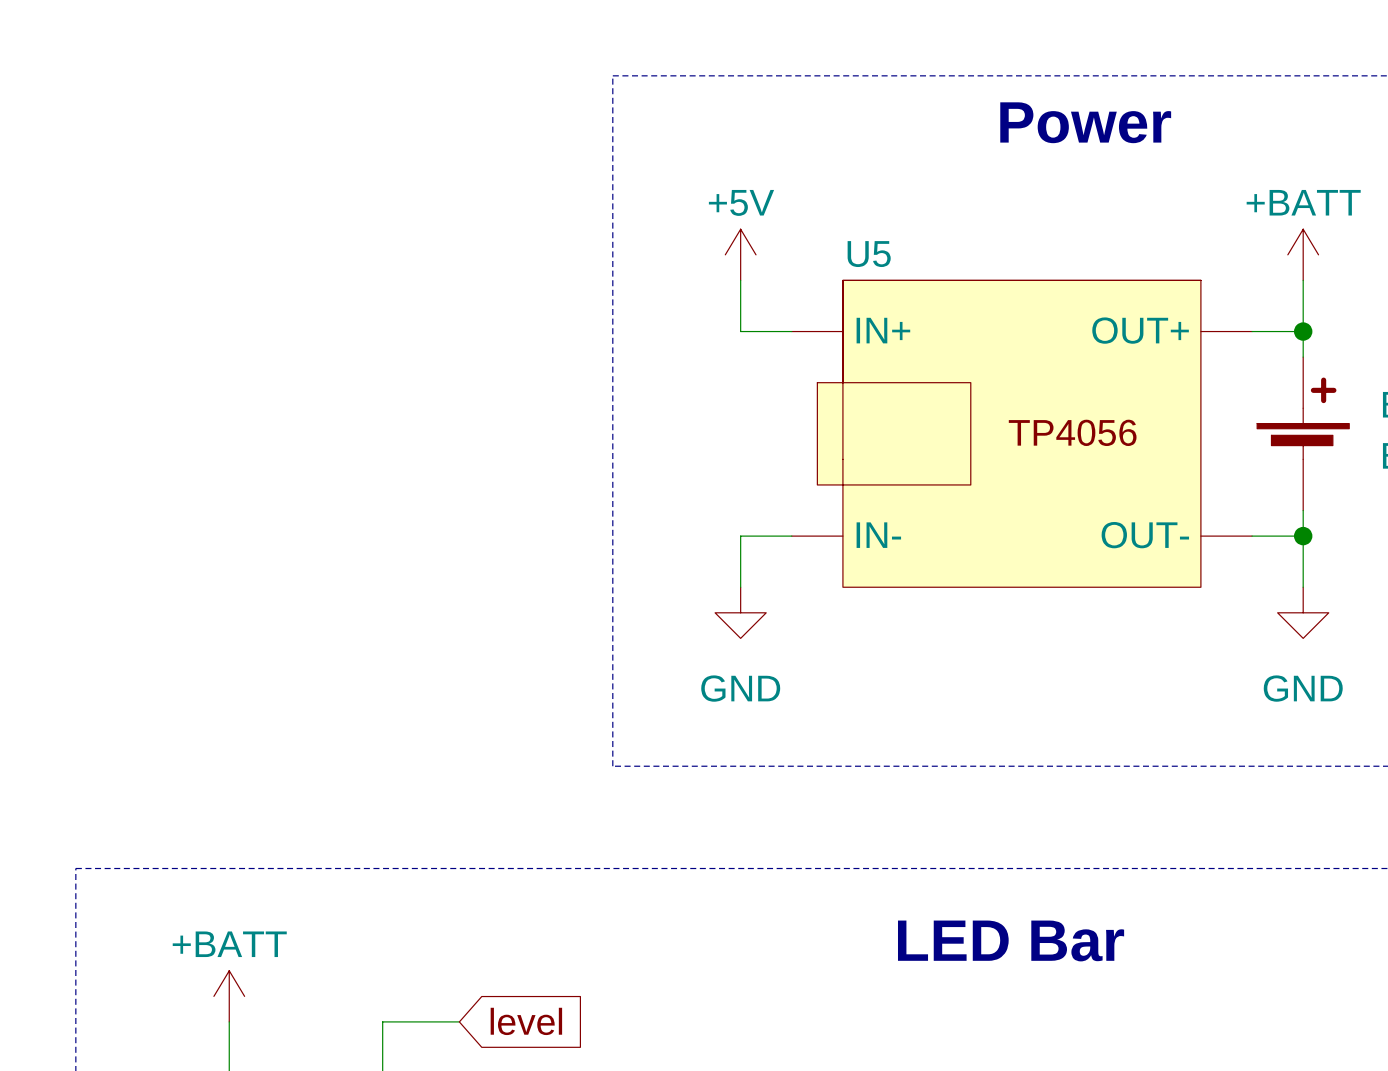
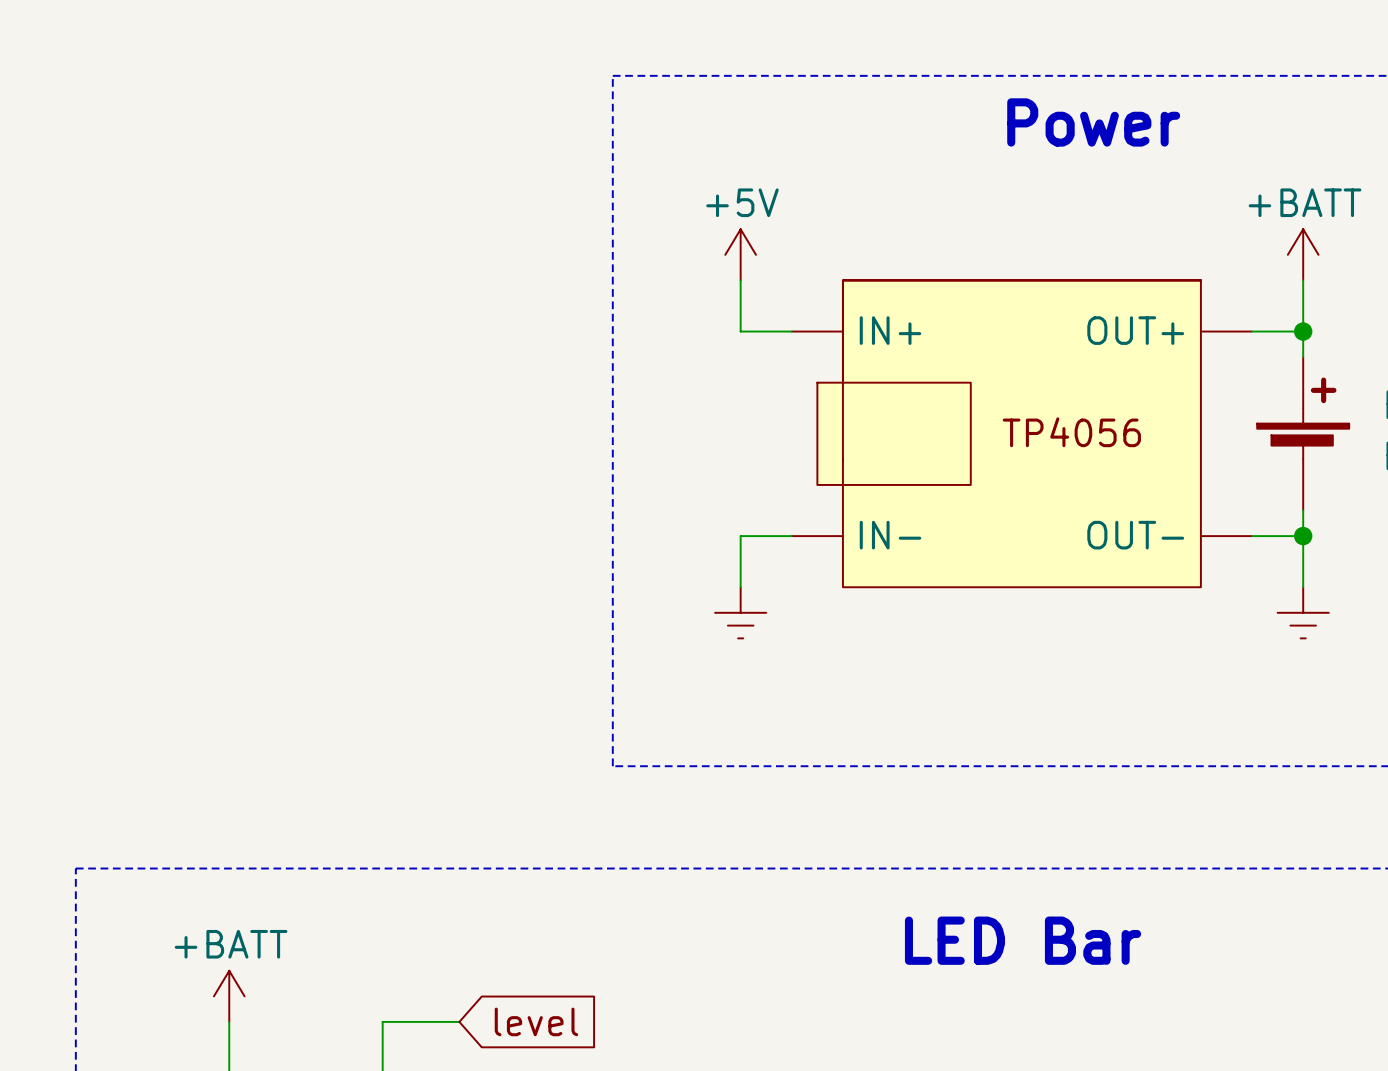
U5 name: U5 (869, 254) -> none
power symbol shape: [715, 587, 767, 639] -> [715, 587, 767, 639]
power symbol shape: [1277, 587, 1329, 639] -> [1277, 587, 1329, 639]
power symbol text: GND (740, 688) -> none
power symbol text: GND (1303, 688) -> none

